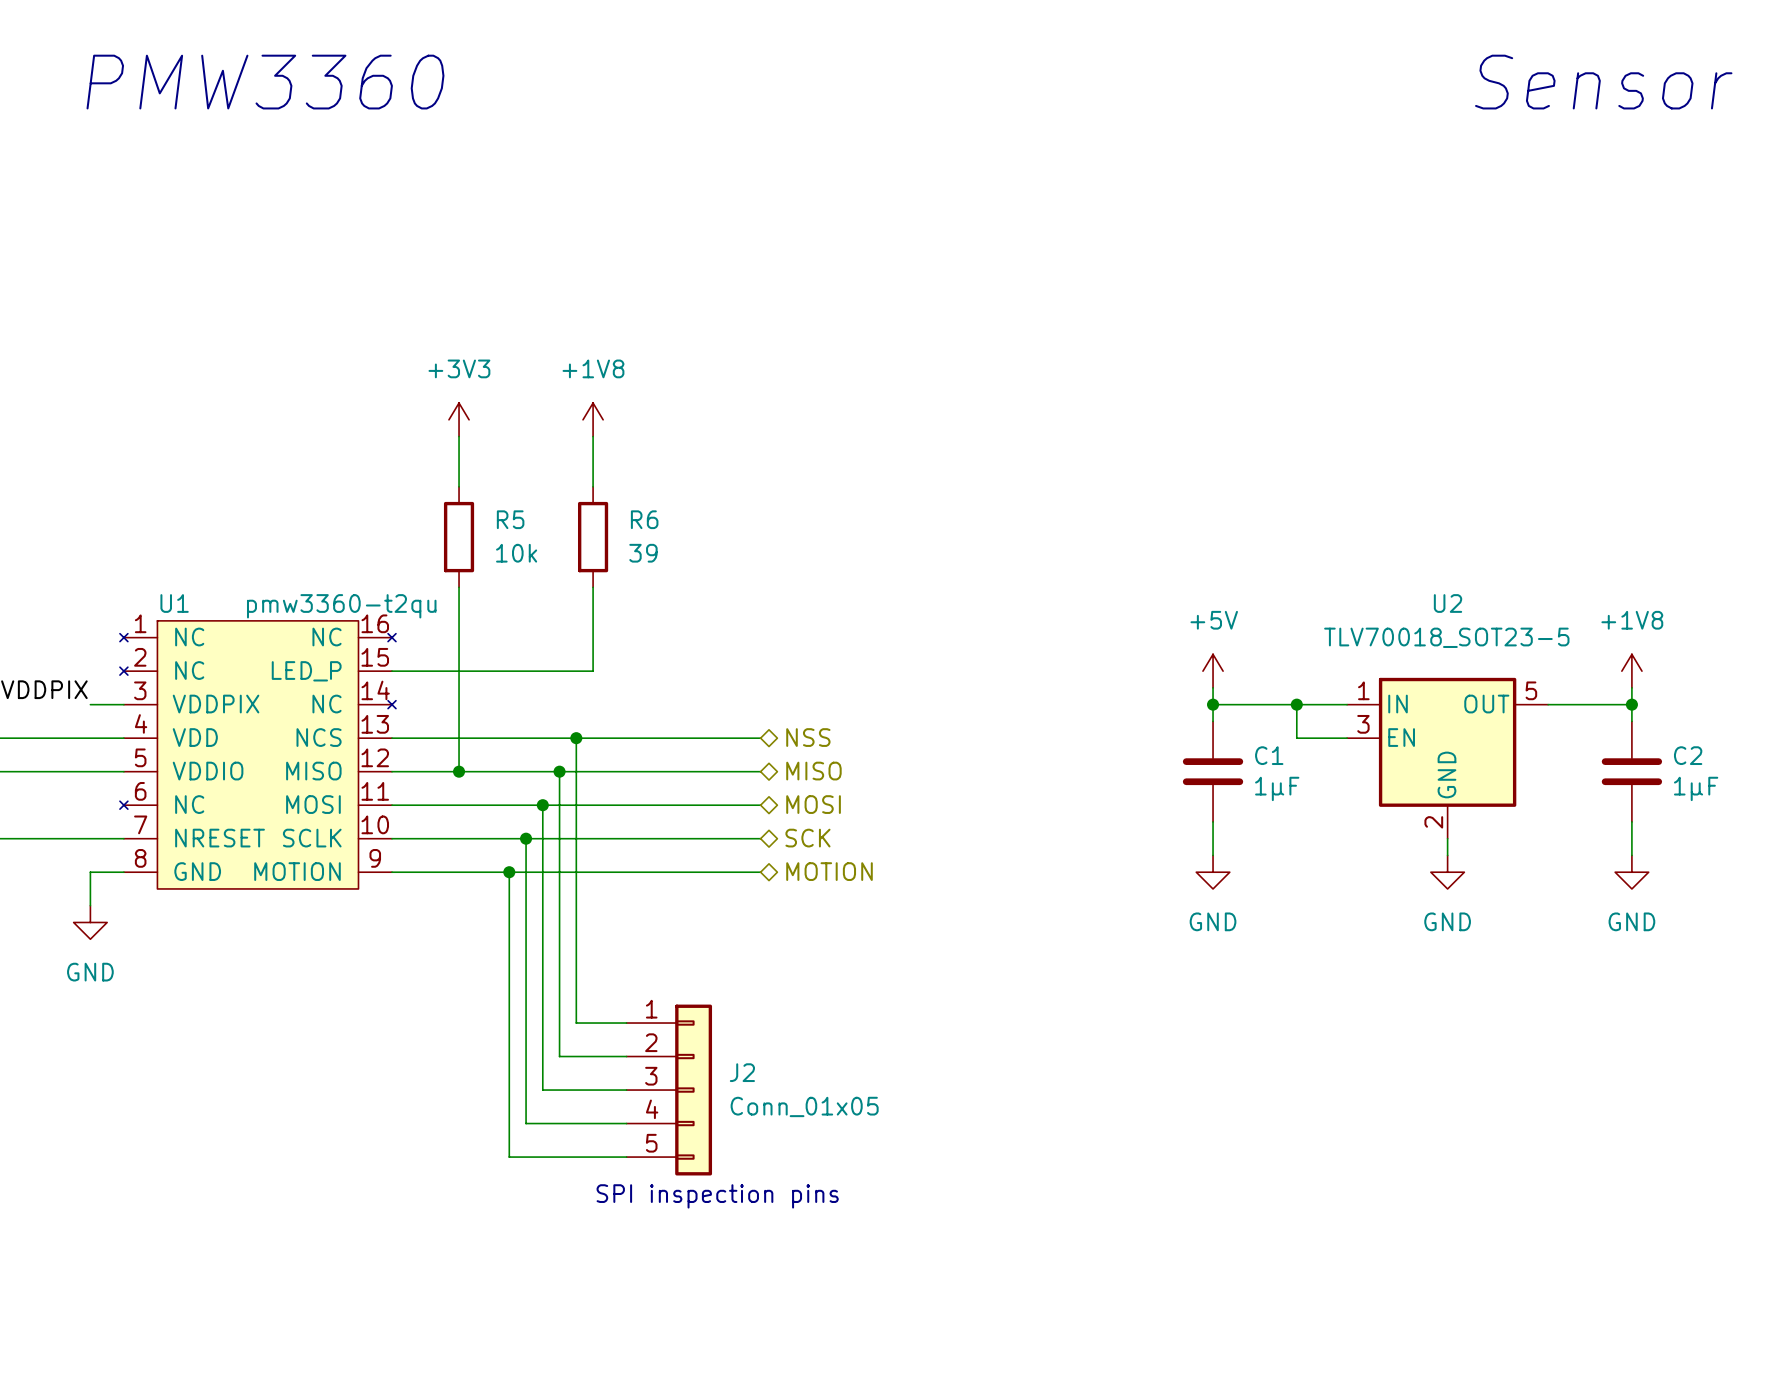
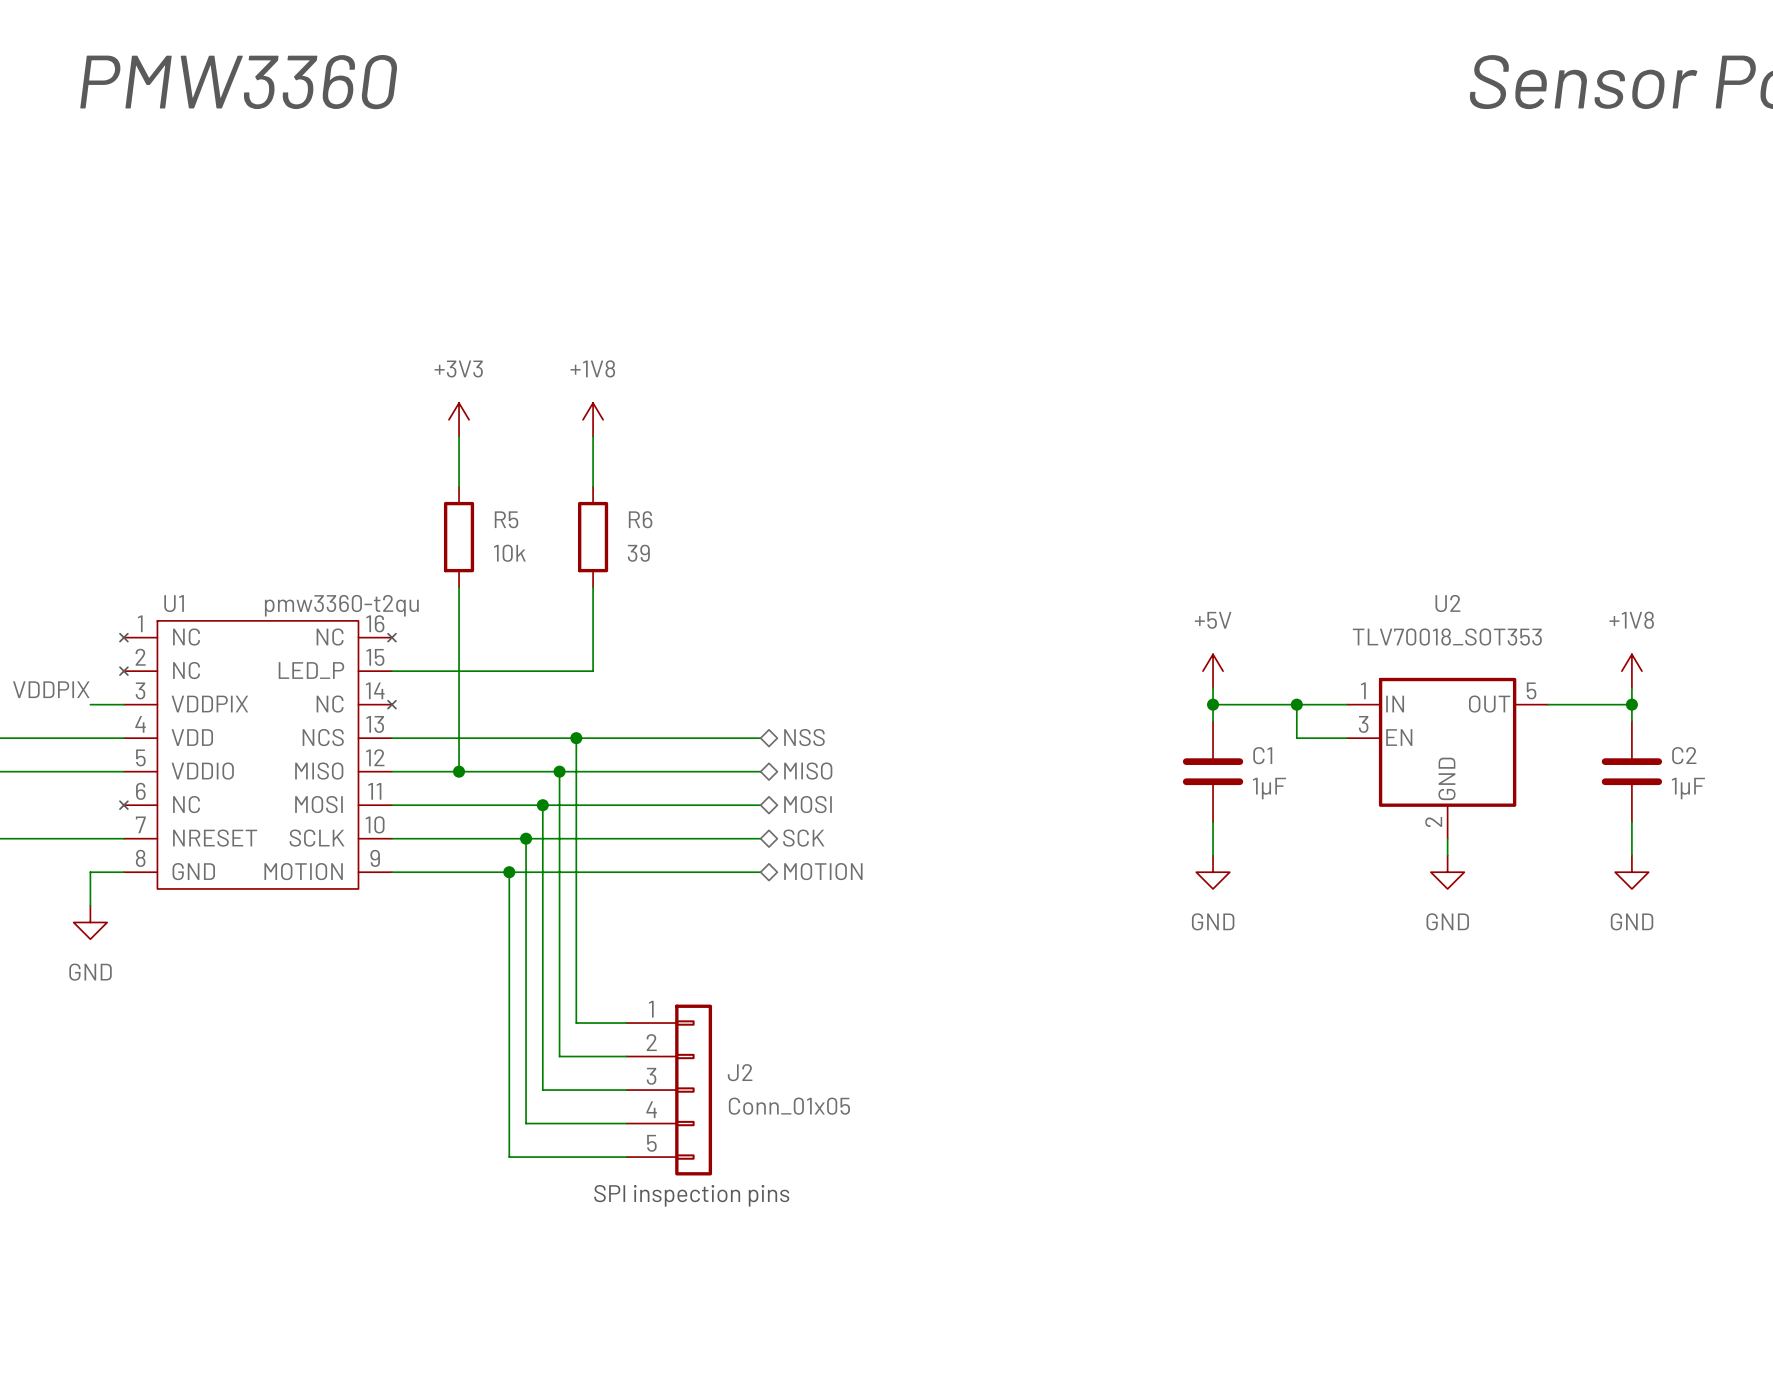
U2 value: TLV70018_SOT23-5 (1446, 637) -> TLV70018_SOT353 (1447, 637)

